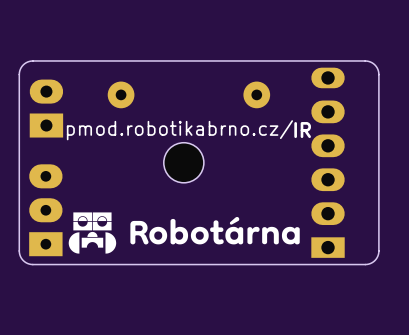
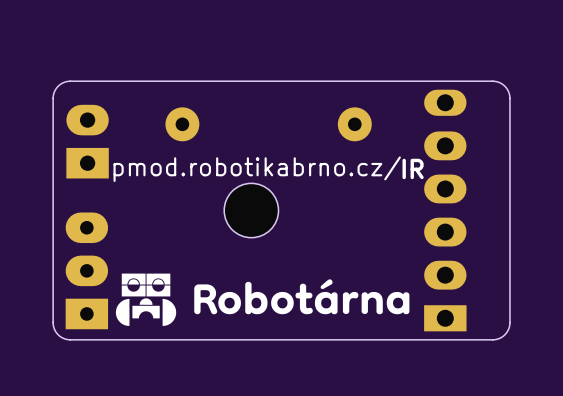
part footprint: [163, 142, 204, 183] -> [224, 183, 279, 238]

